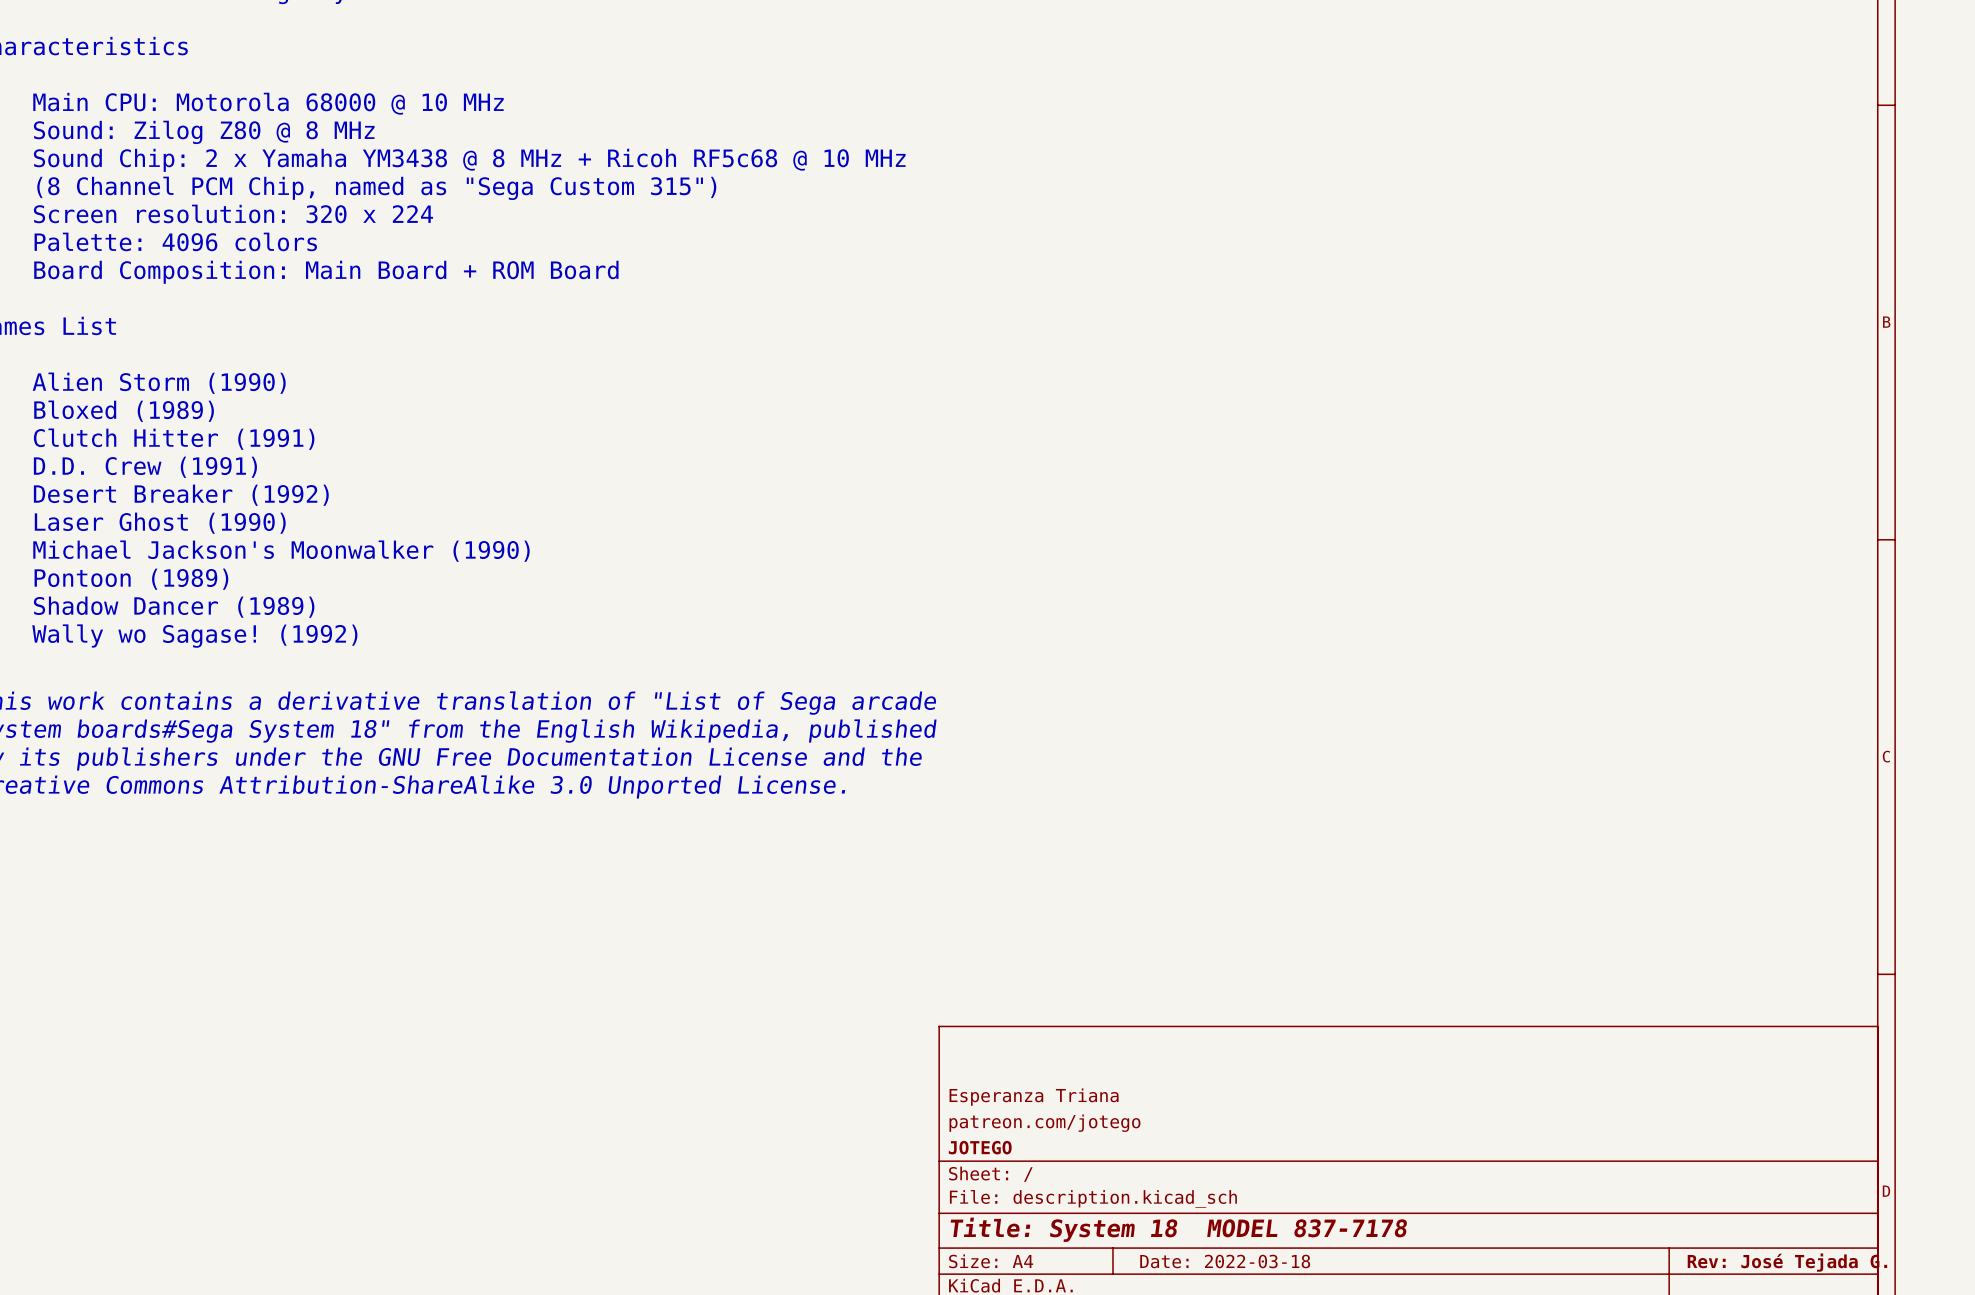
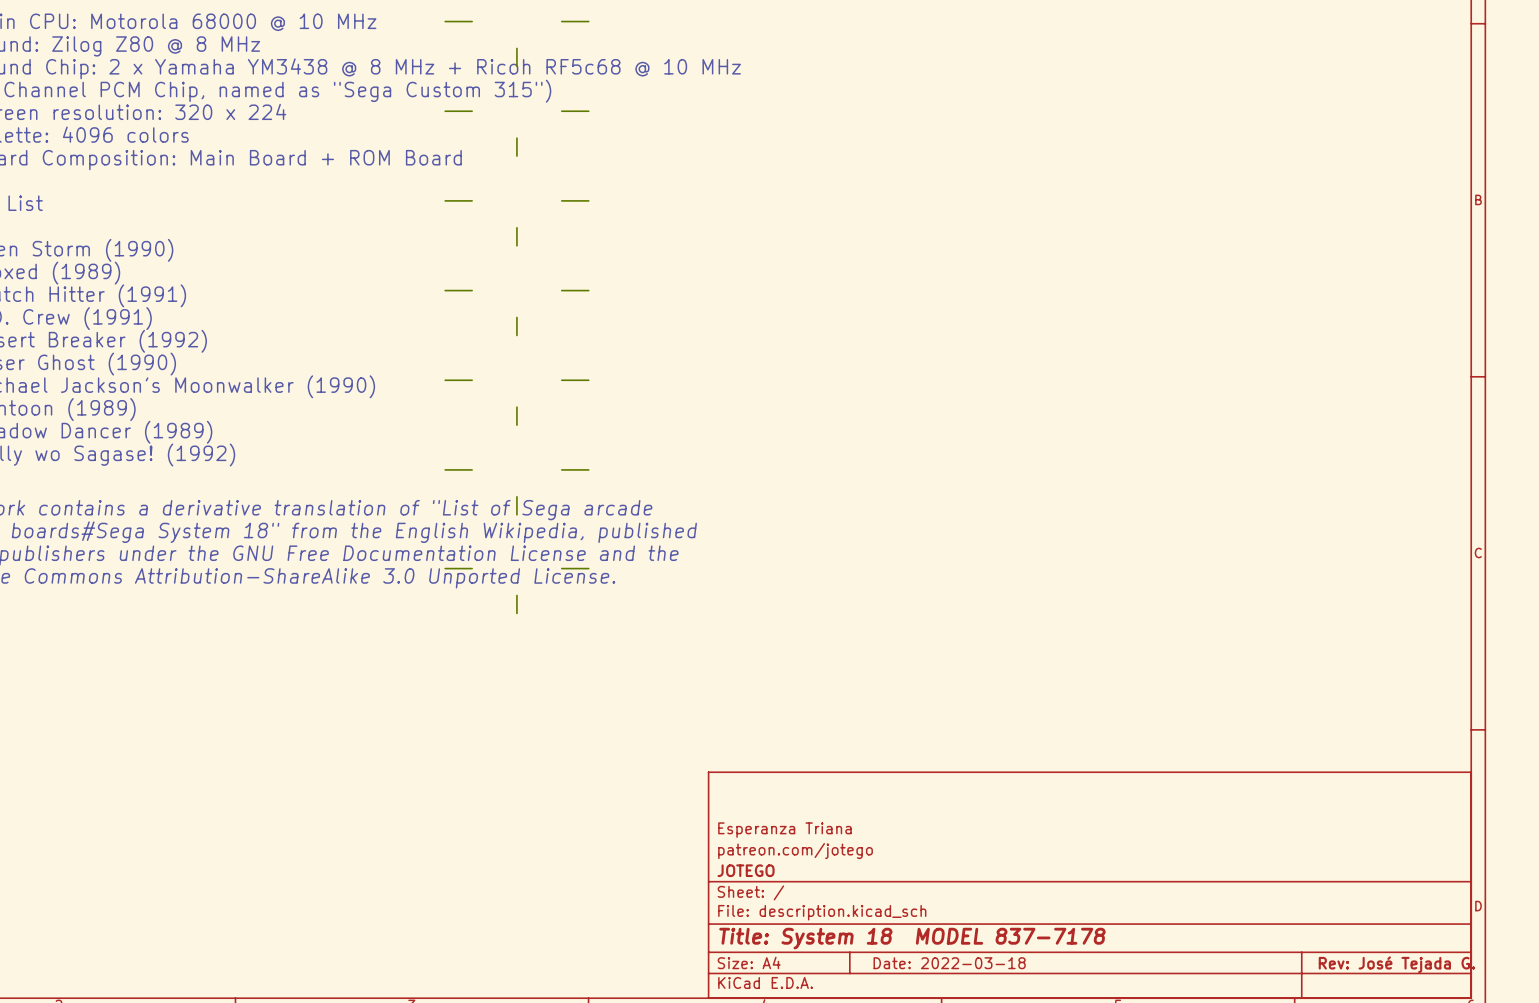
wire: none -> (445, 21) (472, 21)
wire: none -> (561, 21) (588, 21)
wire: none -> (516, 48) (516, 66)
wire: none -> (445, 111) (472, 111)
wire: none -> (561, 111) (588, 111)
wire: none -> (516, 138) (516, 156)
wire: none -> (445, 200) (472, 200)
wire: none -> (561, 200) (588, 200)
wire: none -> (516, 227) (516, 245)
wire: none -> (445, 290) (472, 290)
wire: none -> (561, 290) (588, 290)
wire: none -> (516, 317) (516, 335)
wire: none -> (445, 380) (472, 380)
wire: none -> (561, 380) (588, 380)
wire: none -> (516, 407) (516, 425)
wire: none -> (445, 469) (472, 469)
wire: none -> (561, 469) (588, 469)
wire: none -> (516, 496) (516, 514)
wire: none -> (445, 568) (472, 568)
wire: none -> (561, 568) (588, 568)
wire: none -> (516, 595) (516, 613)

